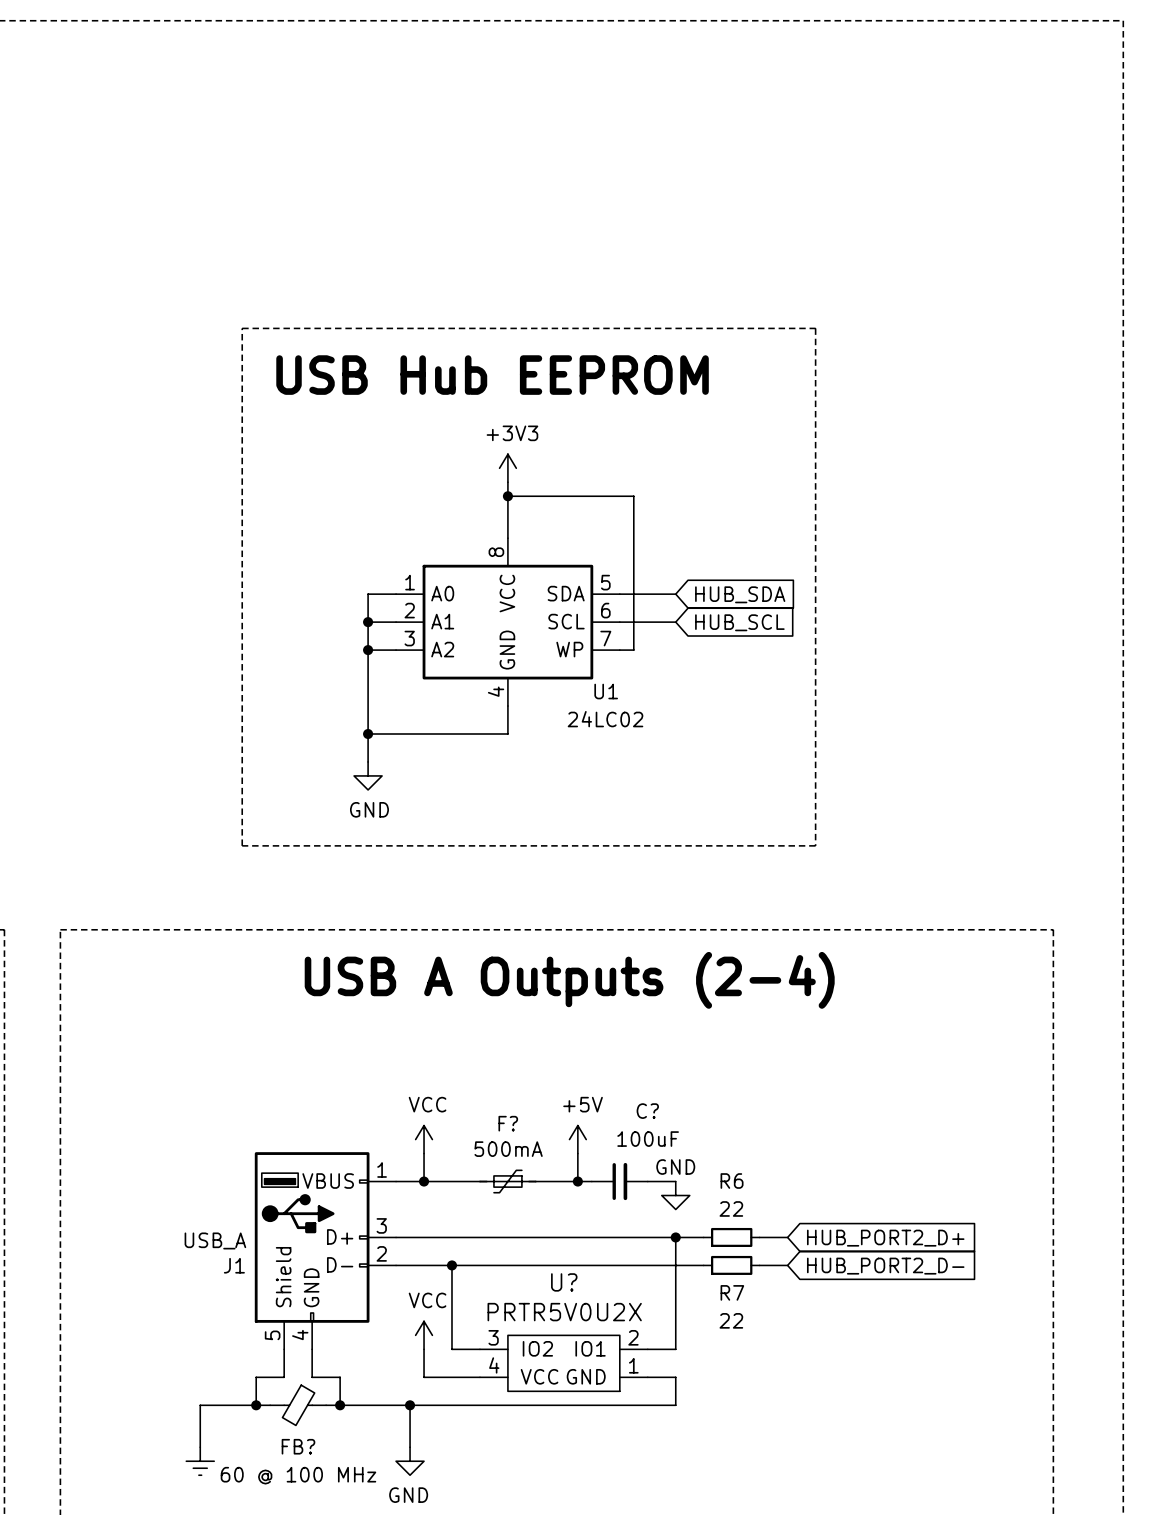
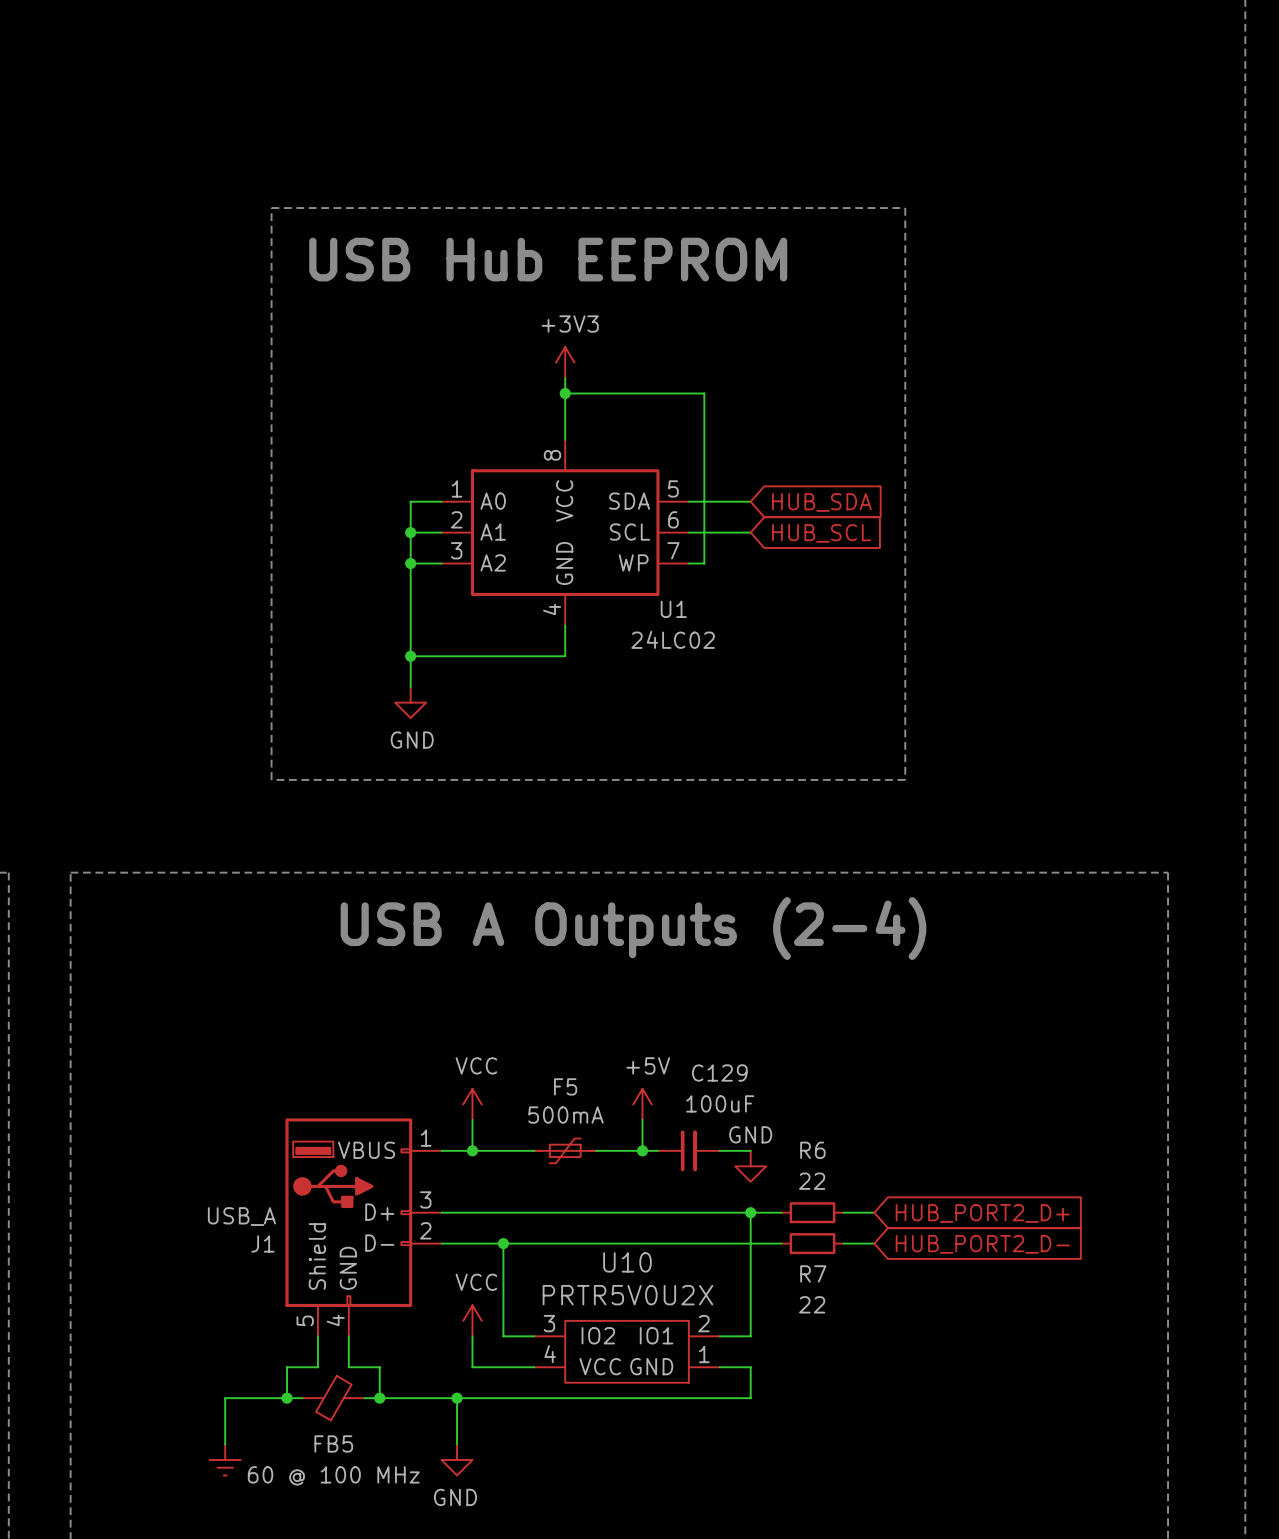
C? name: C? (647, 1111) -> C129 (719, 1073)
F? name: F? (508, 1123) -> F5 (565, 1086)
U? name: U? (564, 1282) -> U10 (627, 1262)
FB? name: FB? (298, 1446) -> FB5 (333, 1443)

